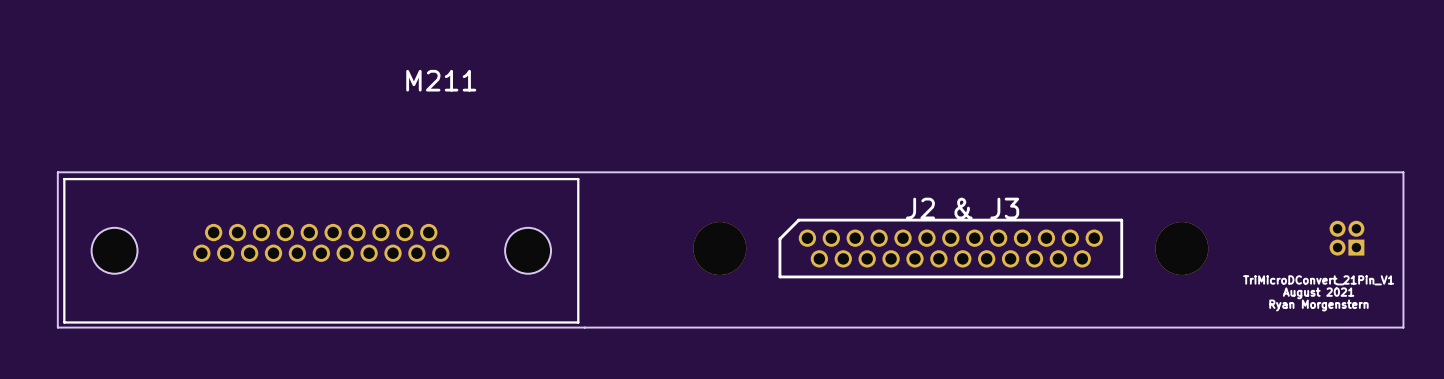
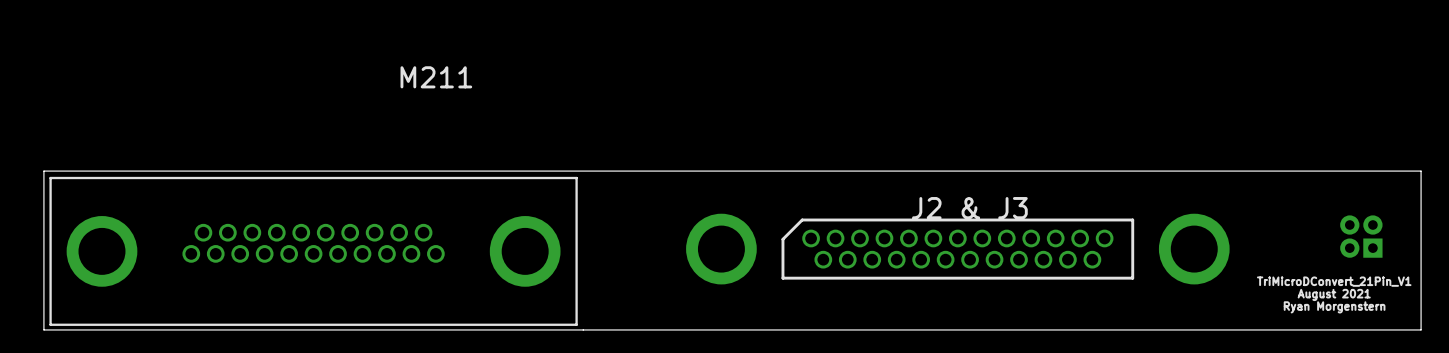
M211 footprint: [63, 177, 580, 324] -> [49, 176, 578, 326]
part footprint: [693, 218, 1209, 279] -> [686, 213, 1230, 285]
part footprint: [1329, 220, 1365, 256] -> [1340, 215, 1383, 258]

